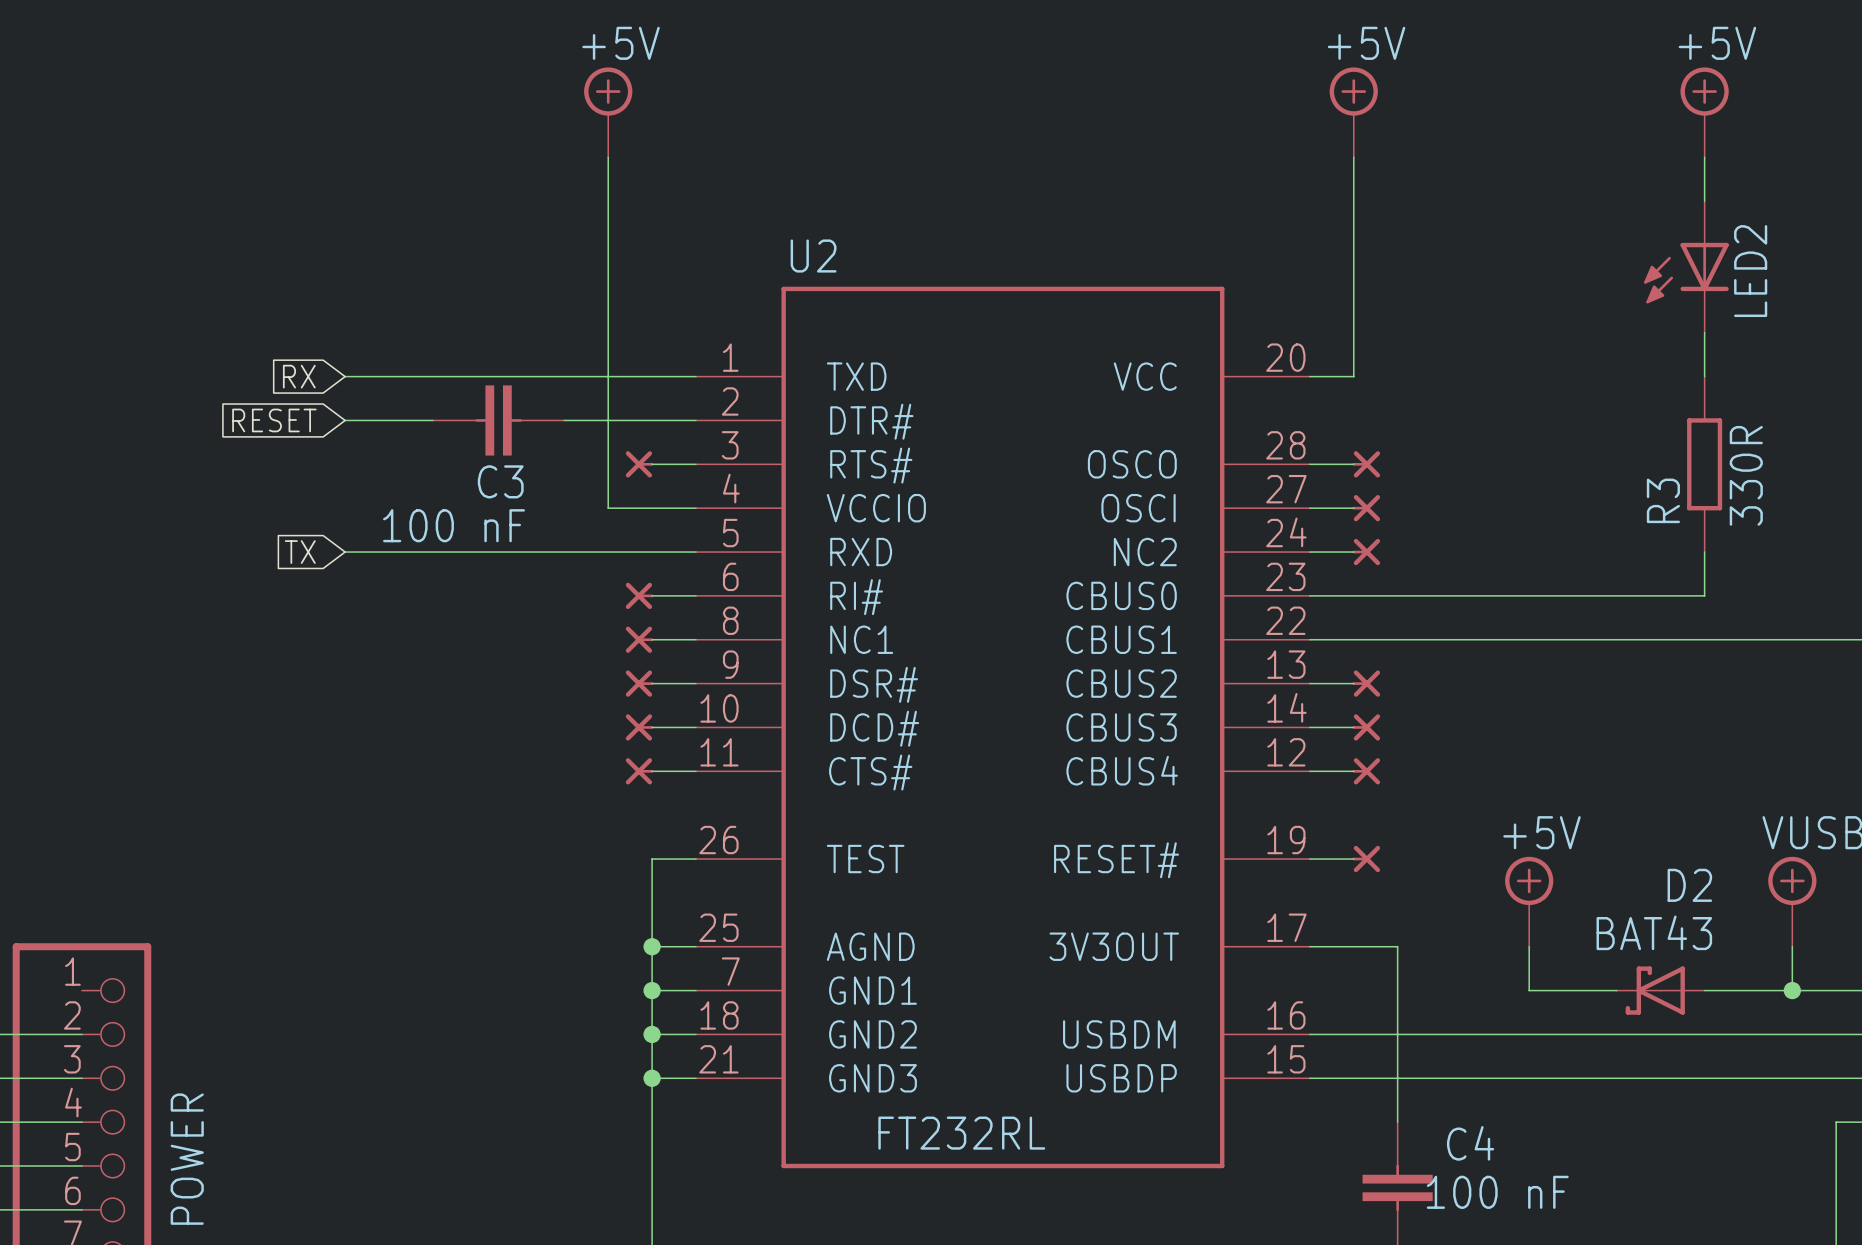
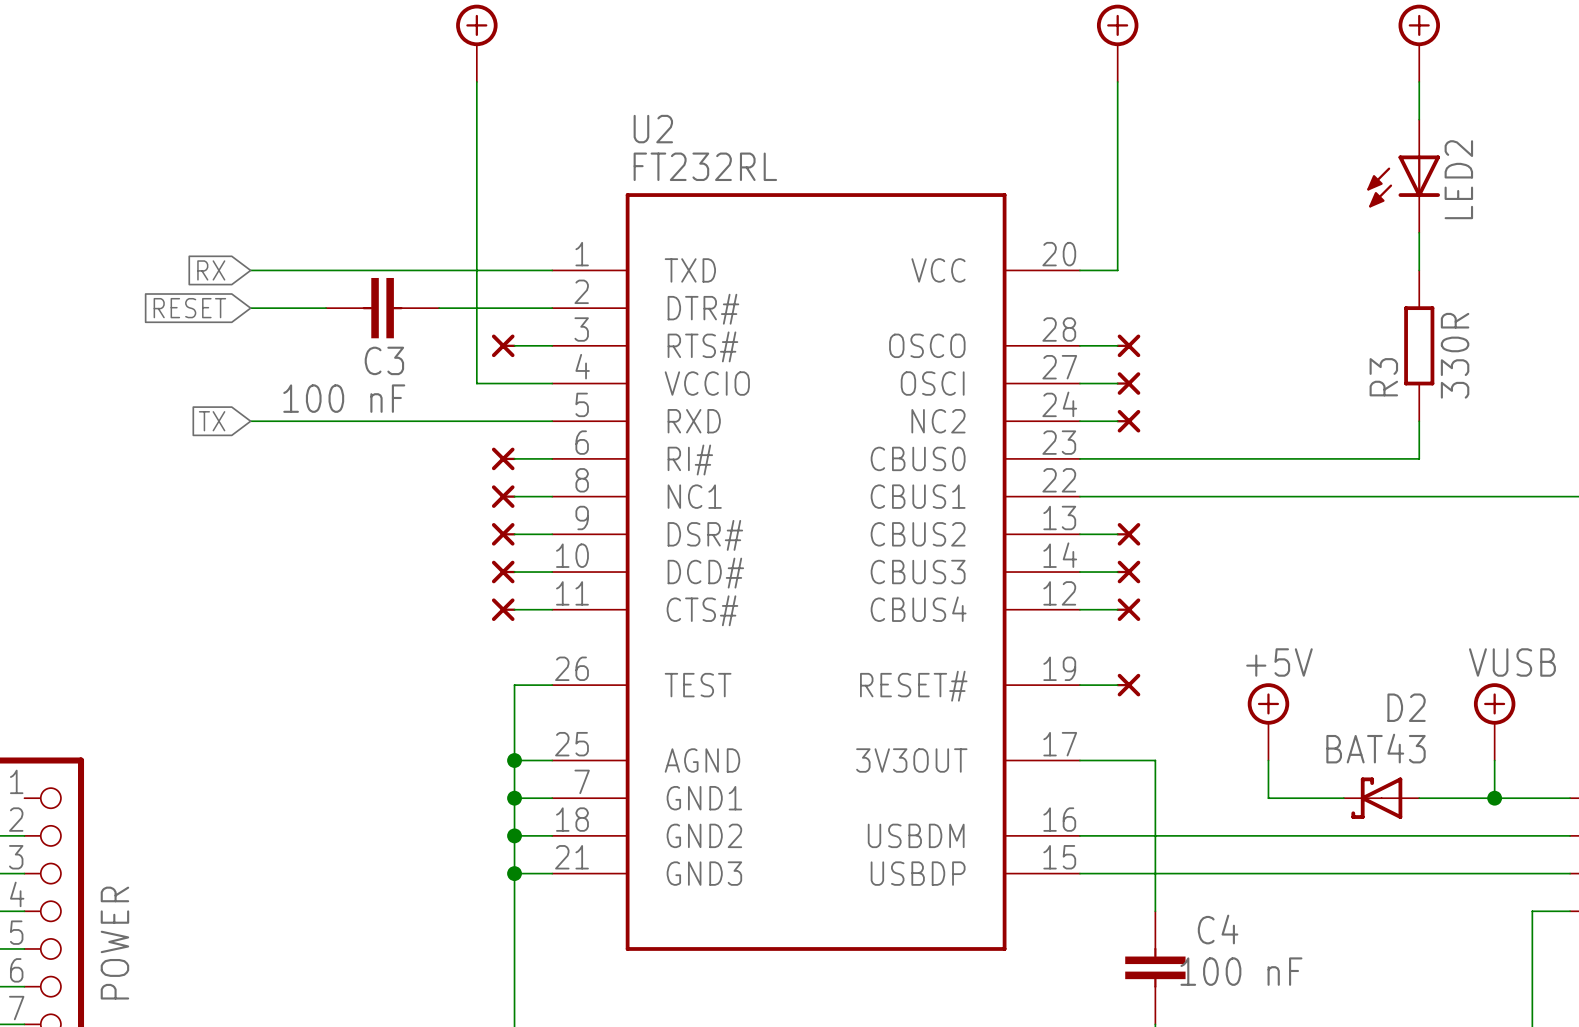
U2 name position: U2 (813, 256) -> U2 (653, 129)
U2 value position: FT232RL (961, 1133) -> FT232RL (705, 166)

